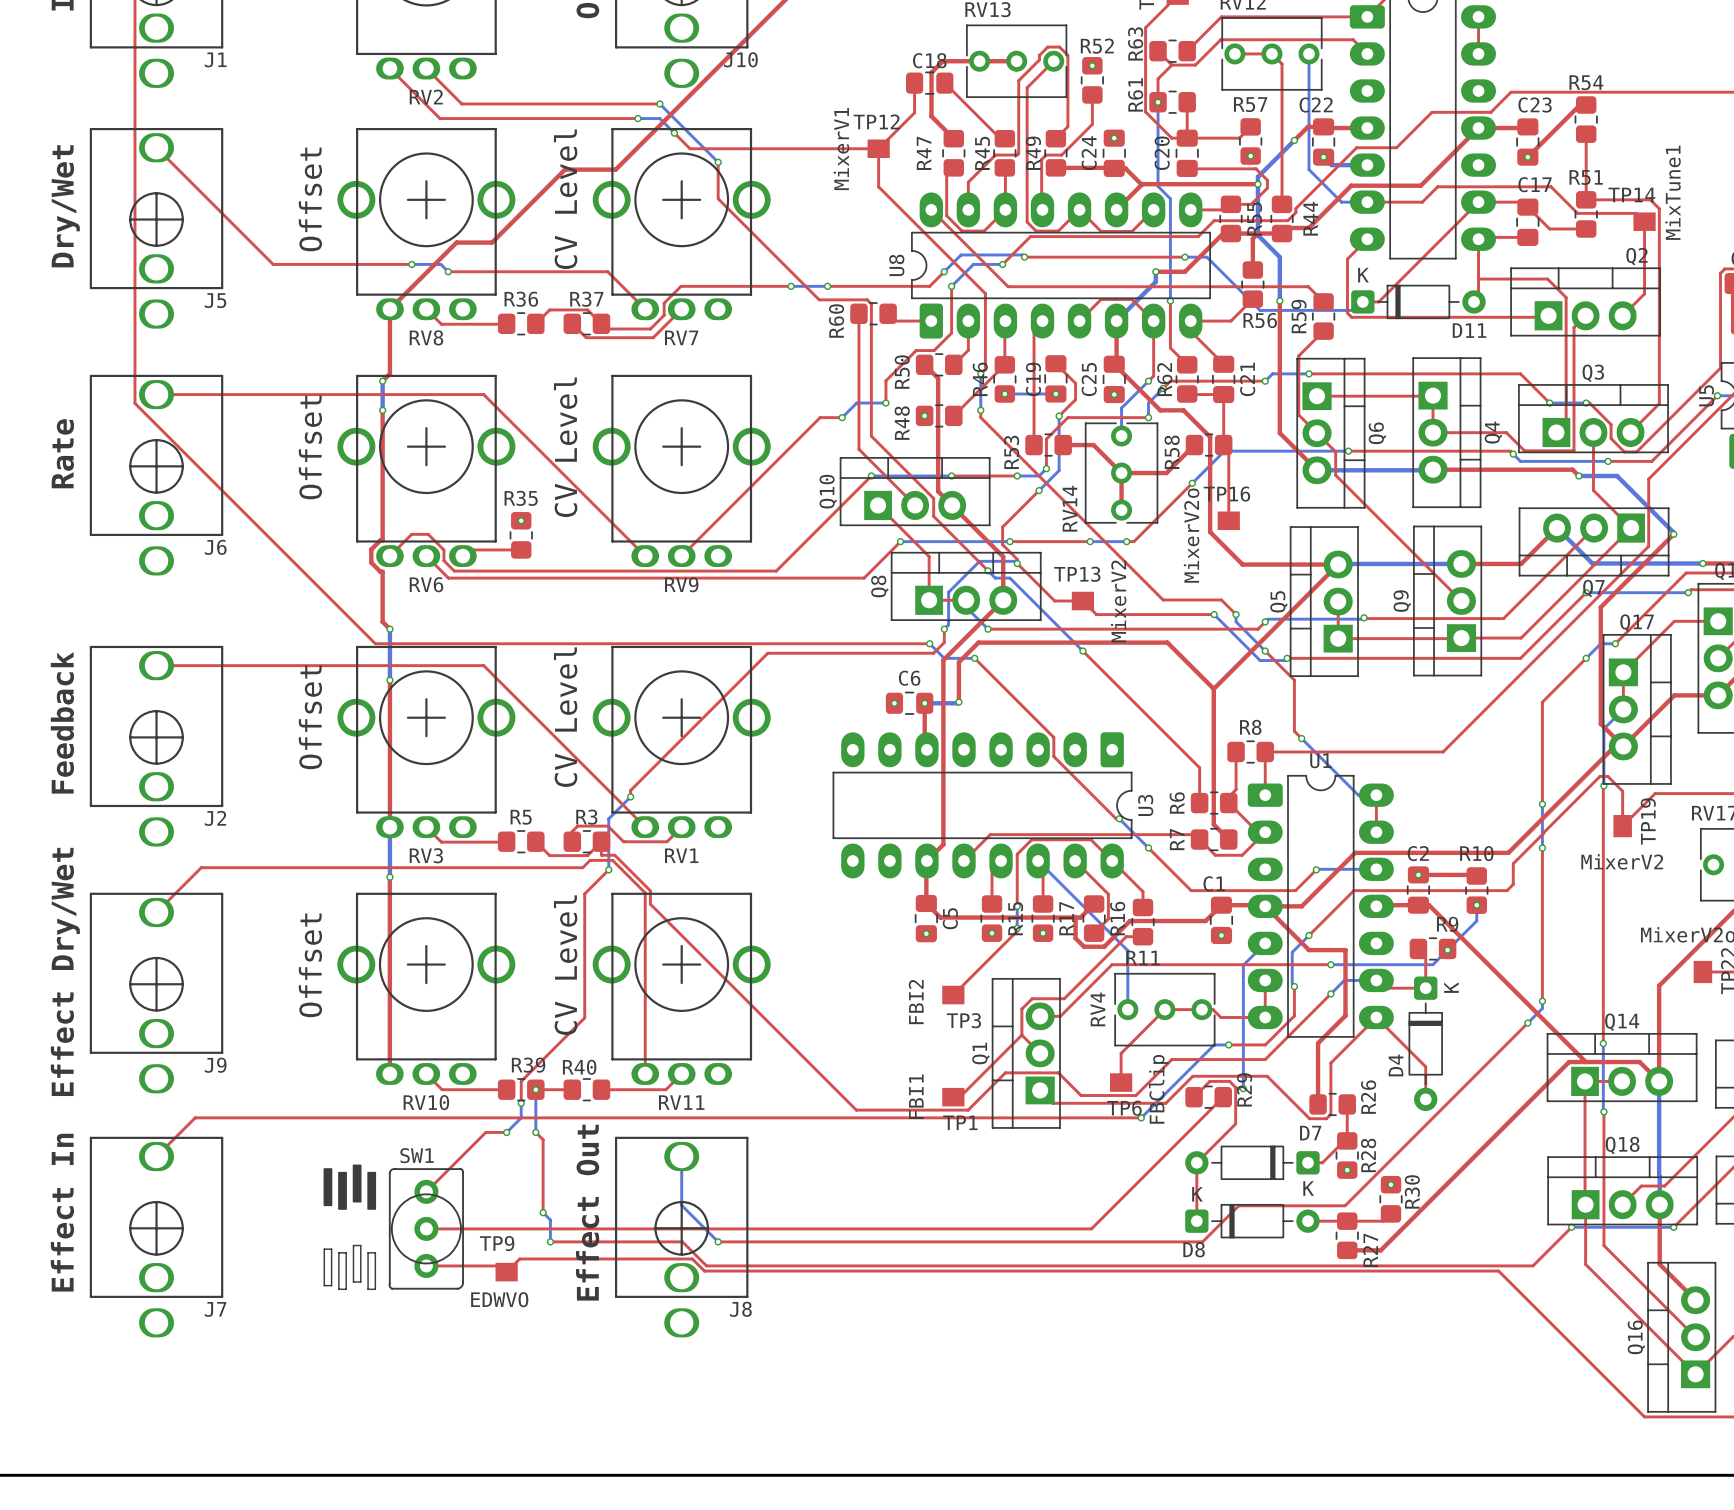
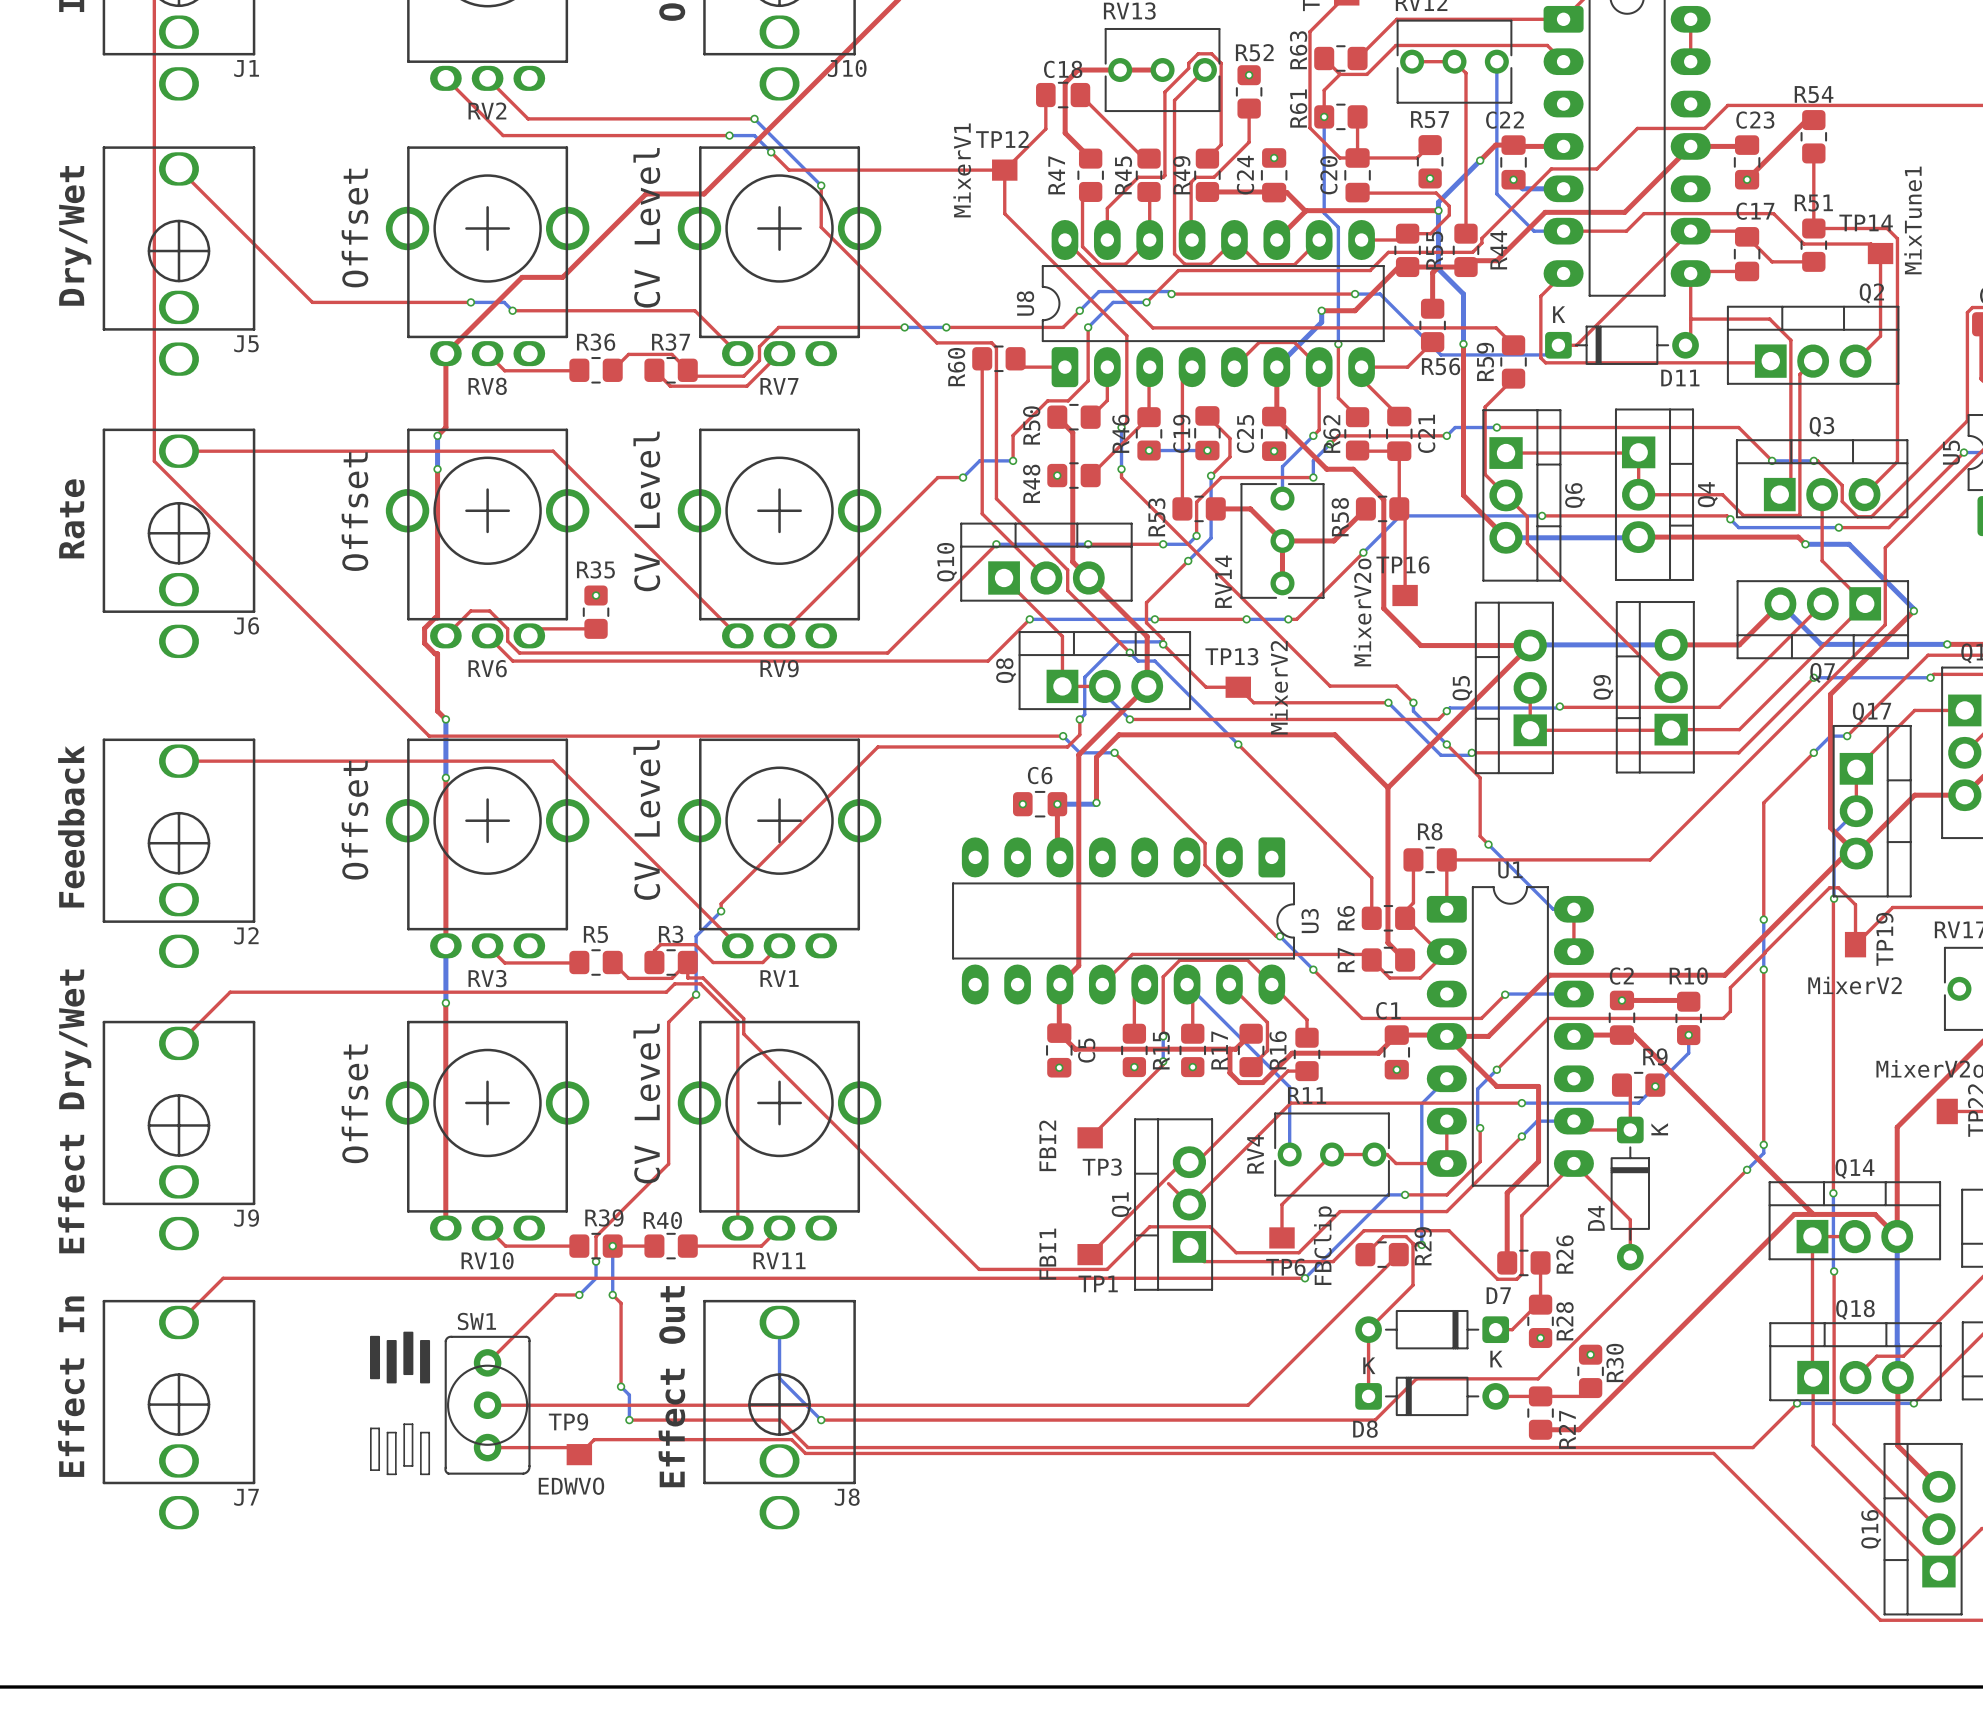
top track: (1128, 964) (1112, 964) (1060, 1016) (1046, 1016) -> (1290, 1103) (1189, 1204)
top track: (1064, 998) (1032, 998) (1021, 1009) (1021, 1035) (959, 1097) (953, 1097) -> (1182, 1162) (1090, 1254)
top track: none -> (1216, 1142) (1196, 1162)

